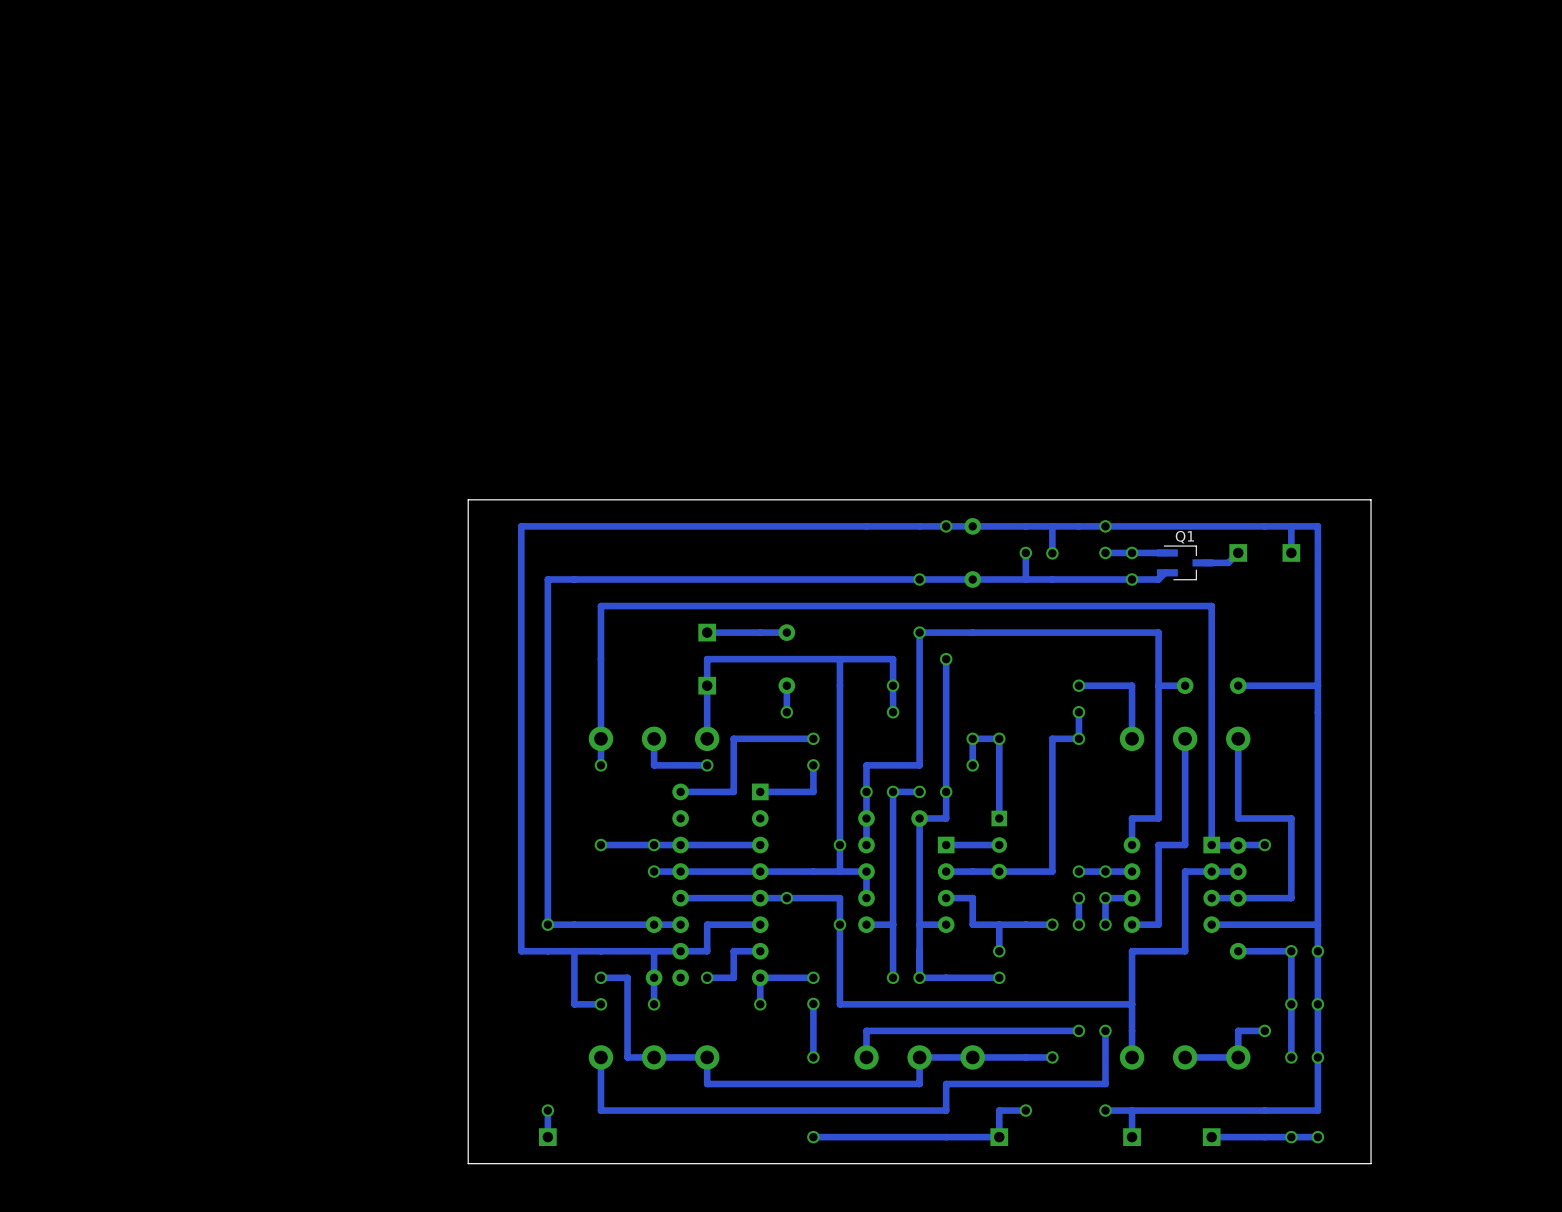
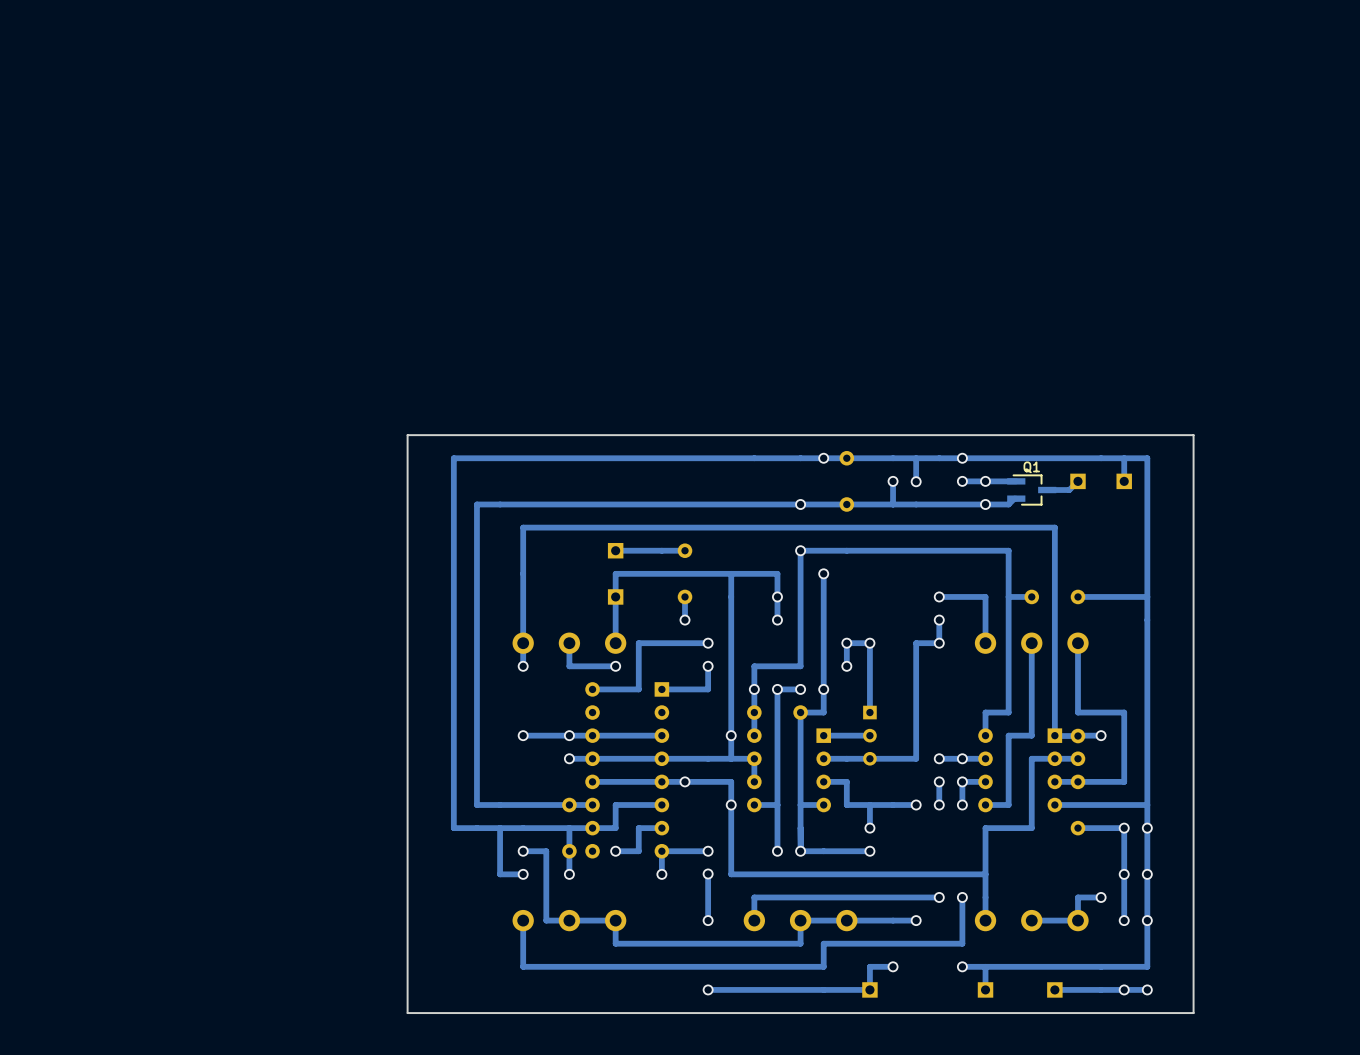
via: (547, 924) -> none
track: (547, 1110) (547, 1137) -> none
via: (547, 1110) -> none
part: (547, 1137) -> none

